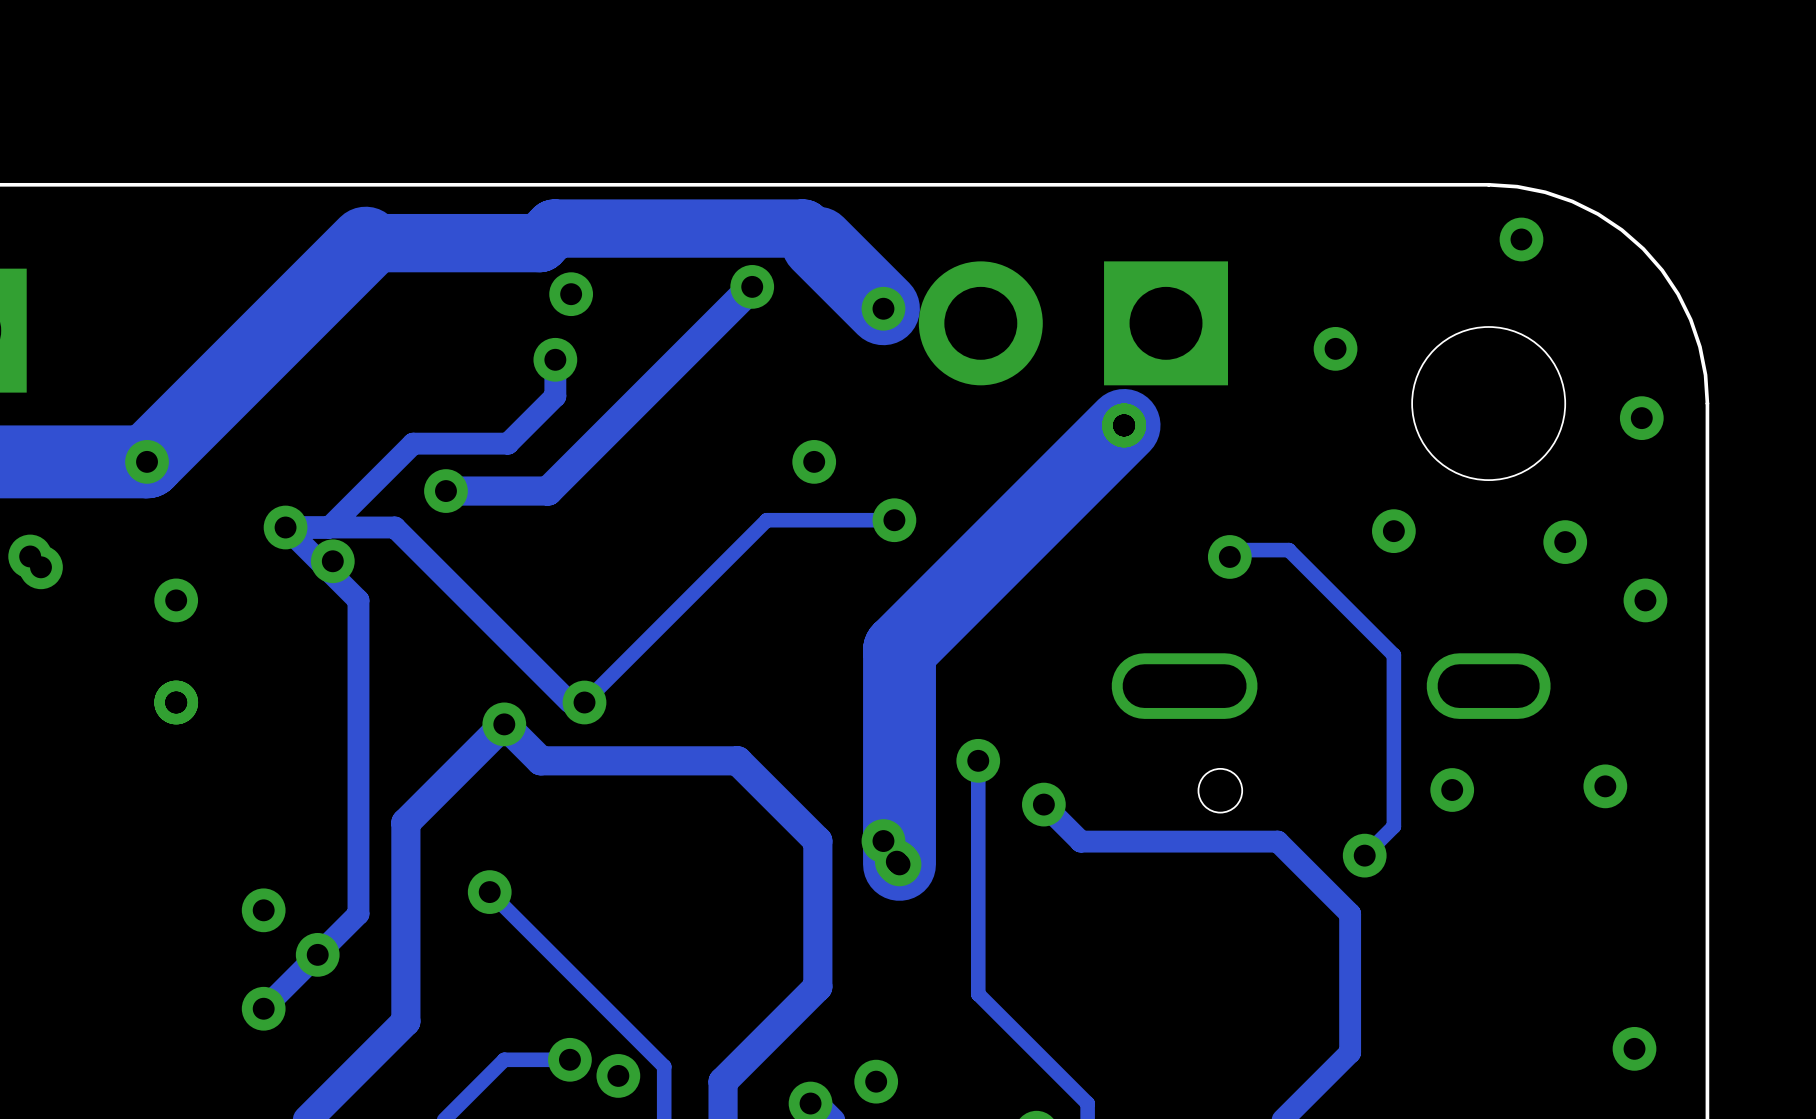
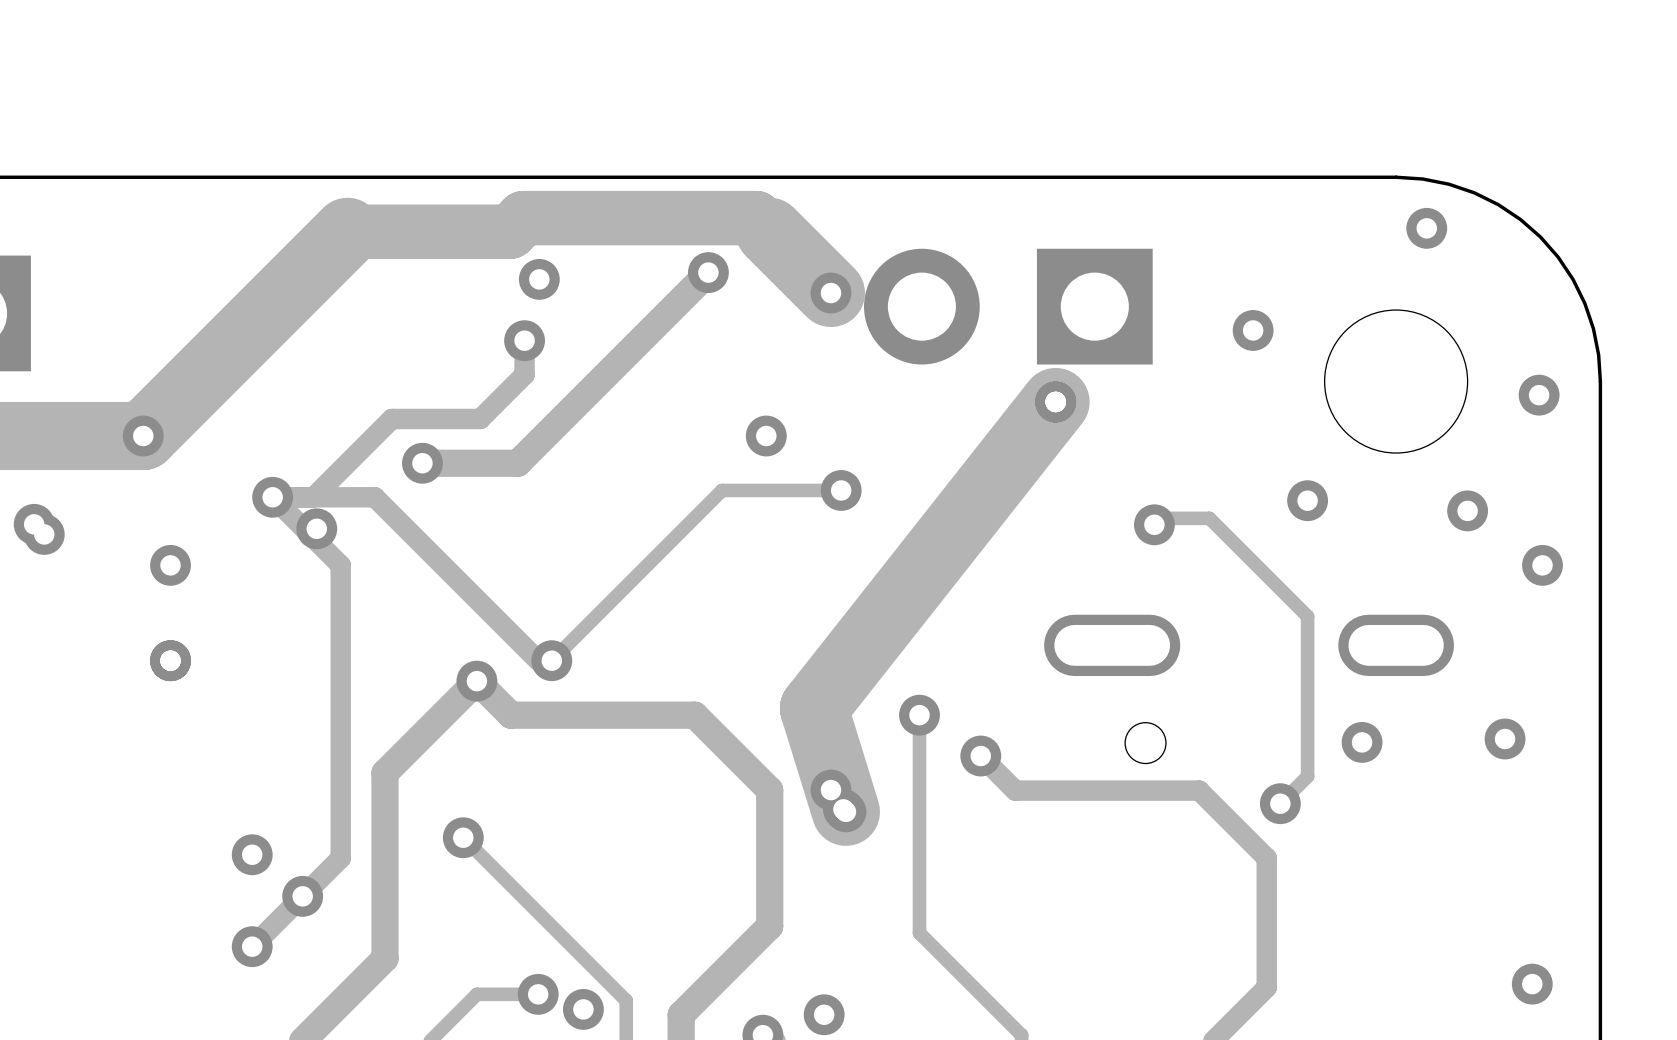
track: (1124, 425) (899, 650) (899, 864) -> (1055, 401) (813, 708) (845, 811)

